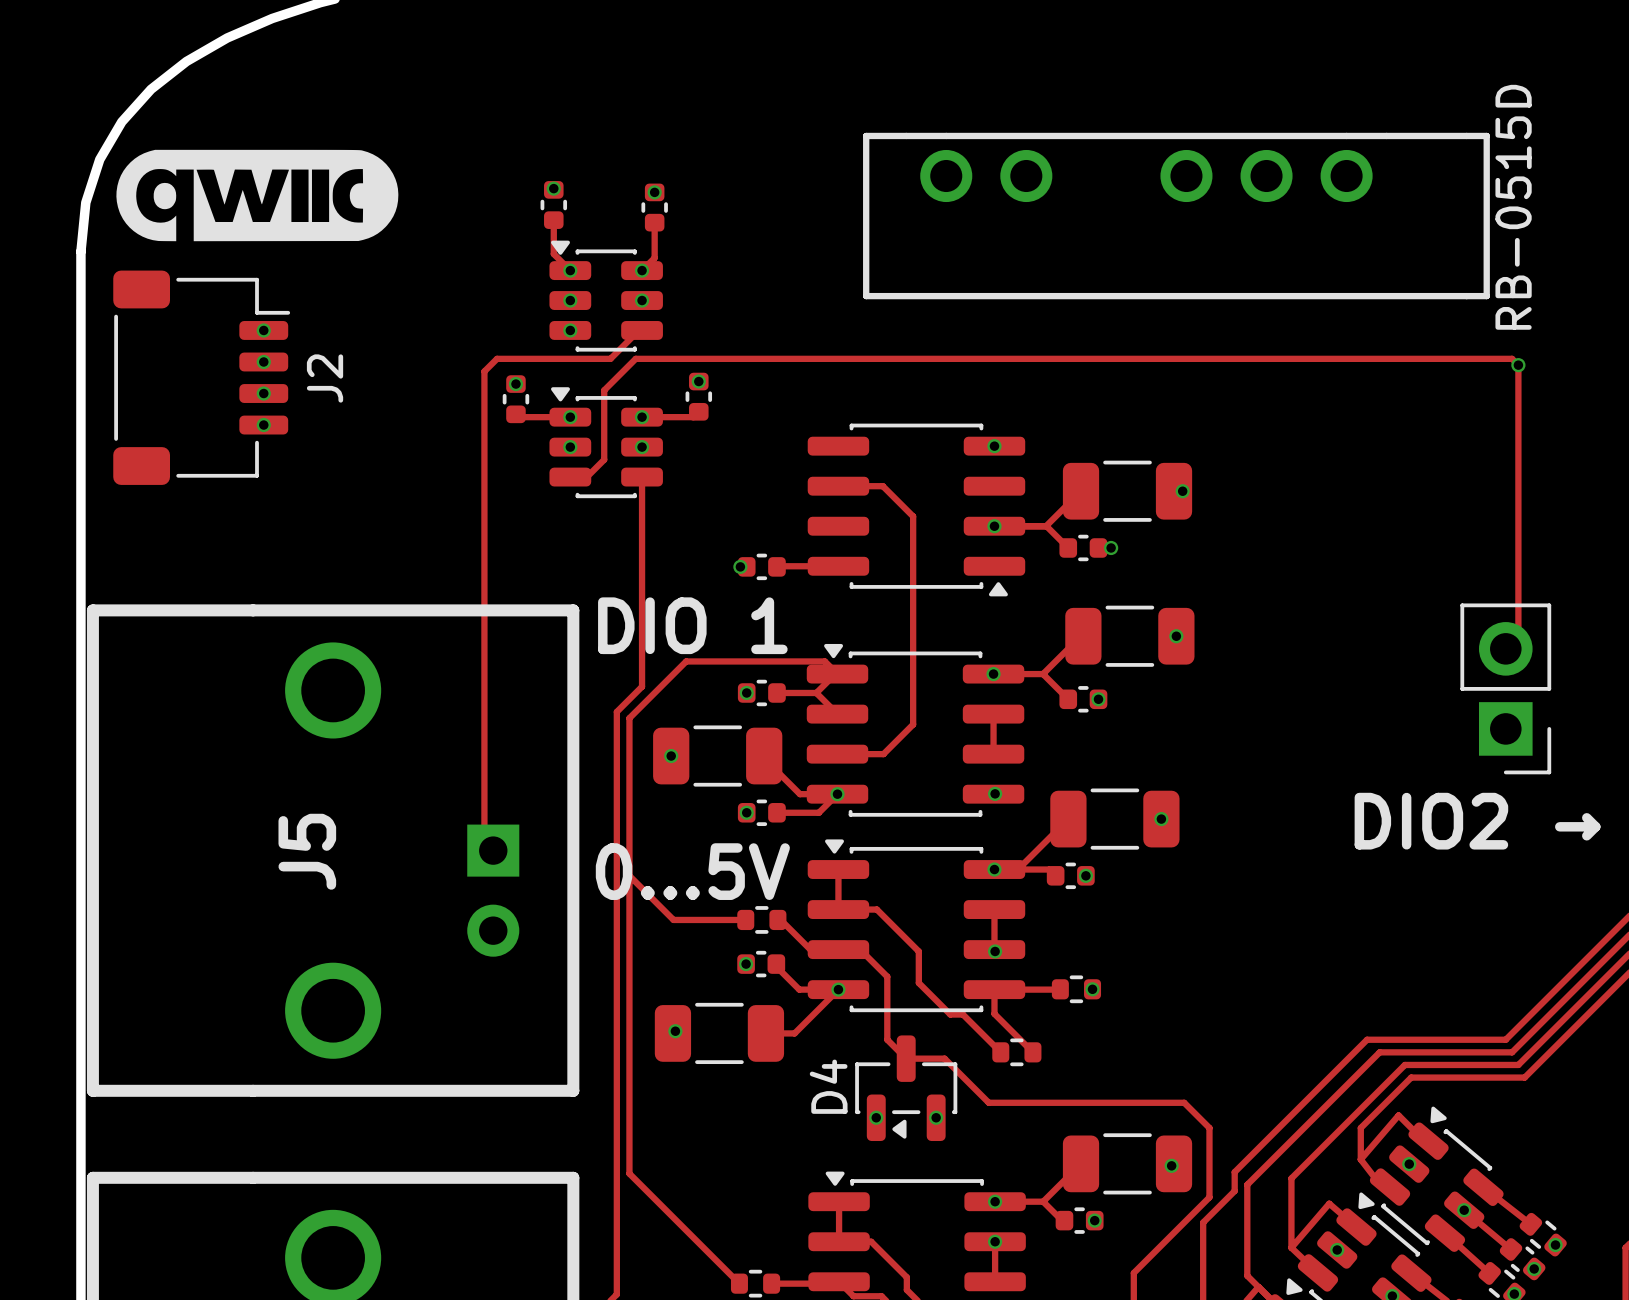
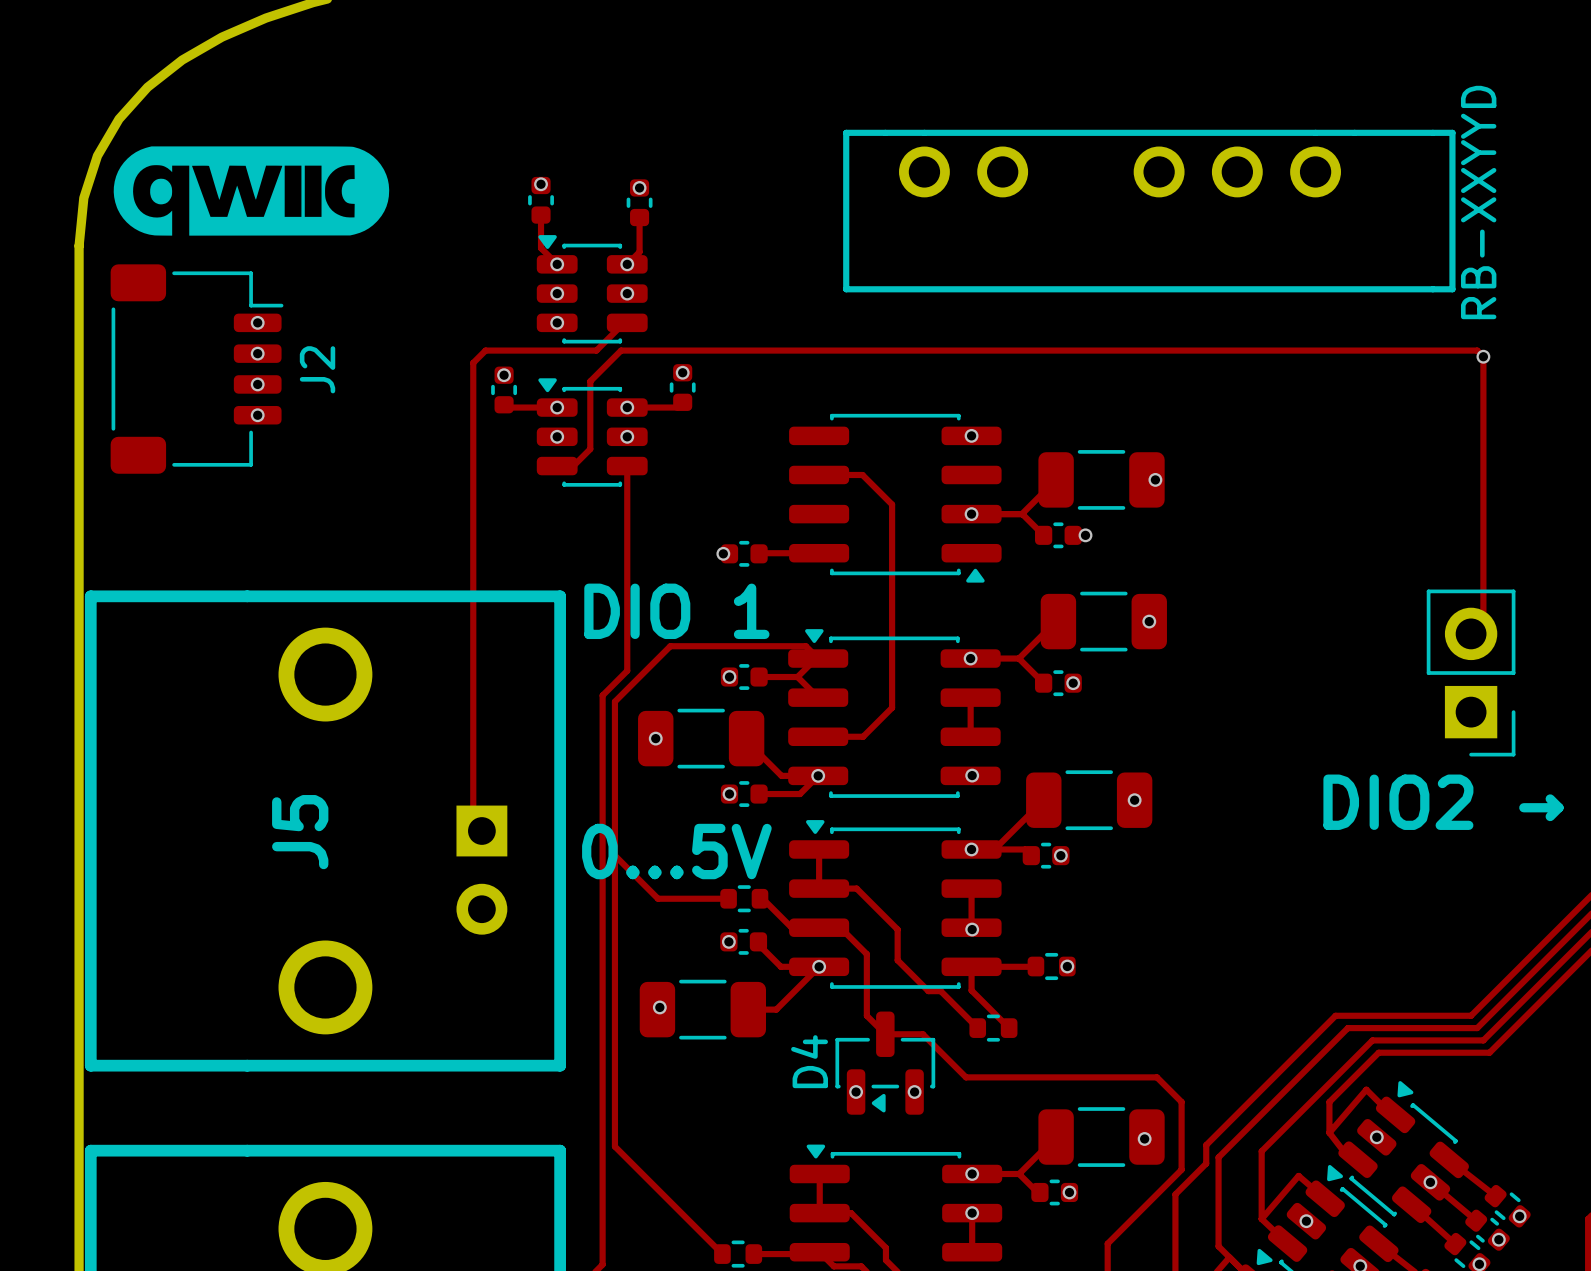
part value: RB-0515D (1513, 207) -> RB-XXYYD (1478, 202)

